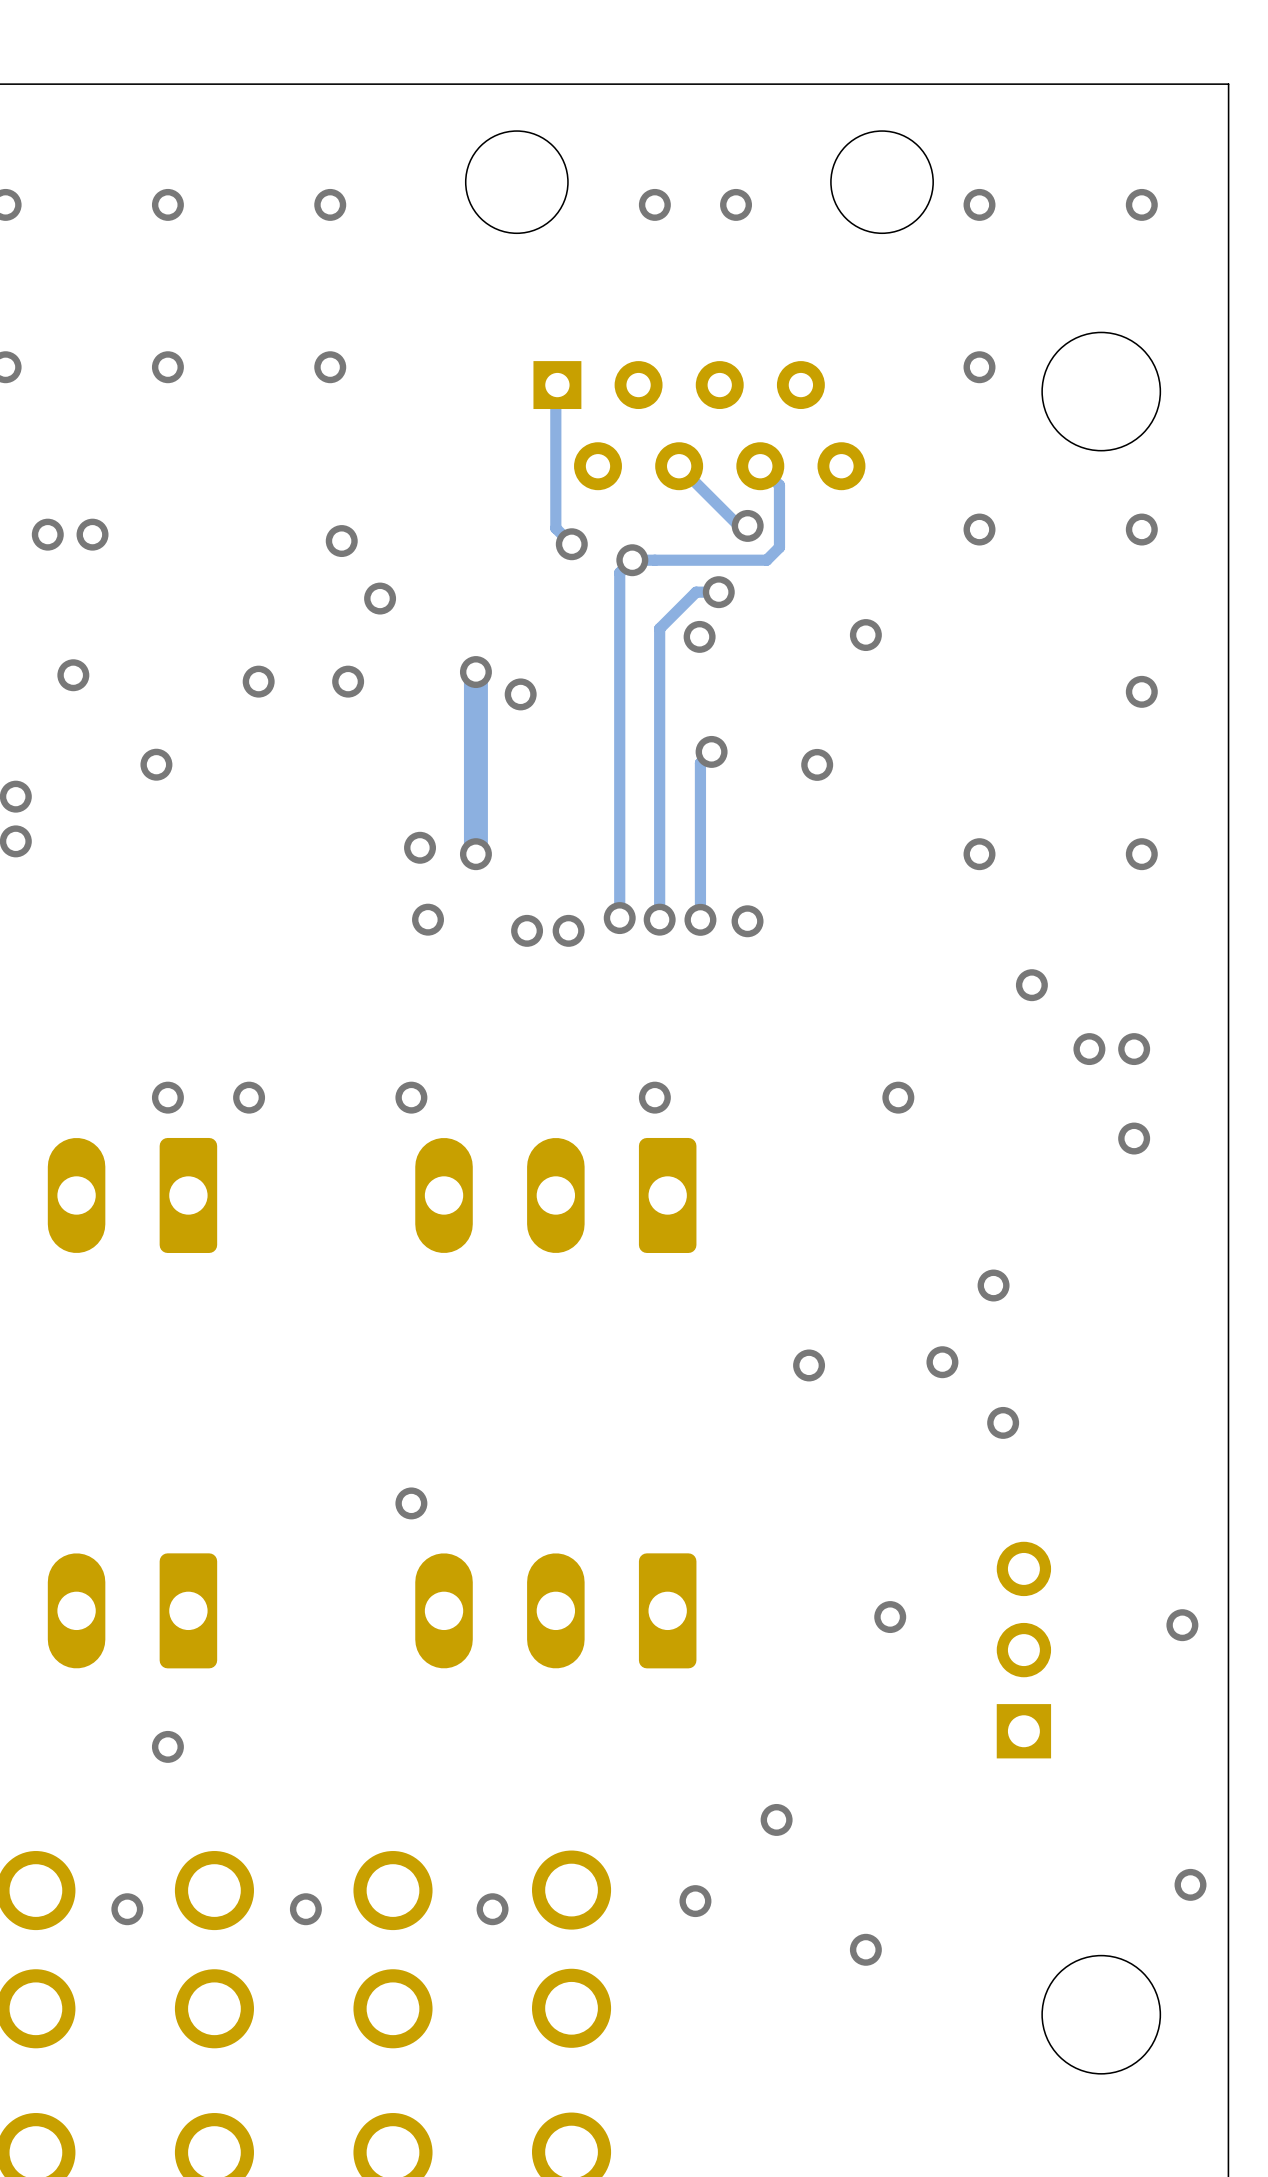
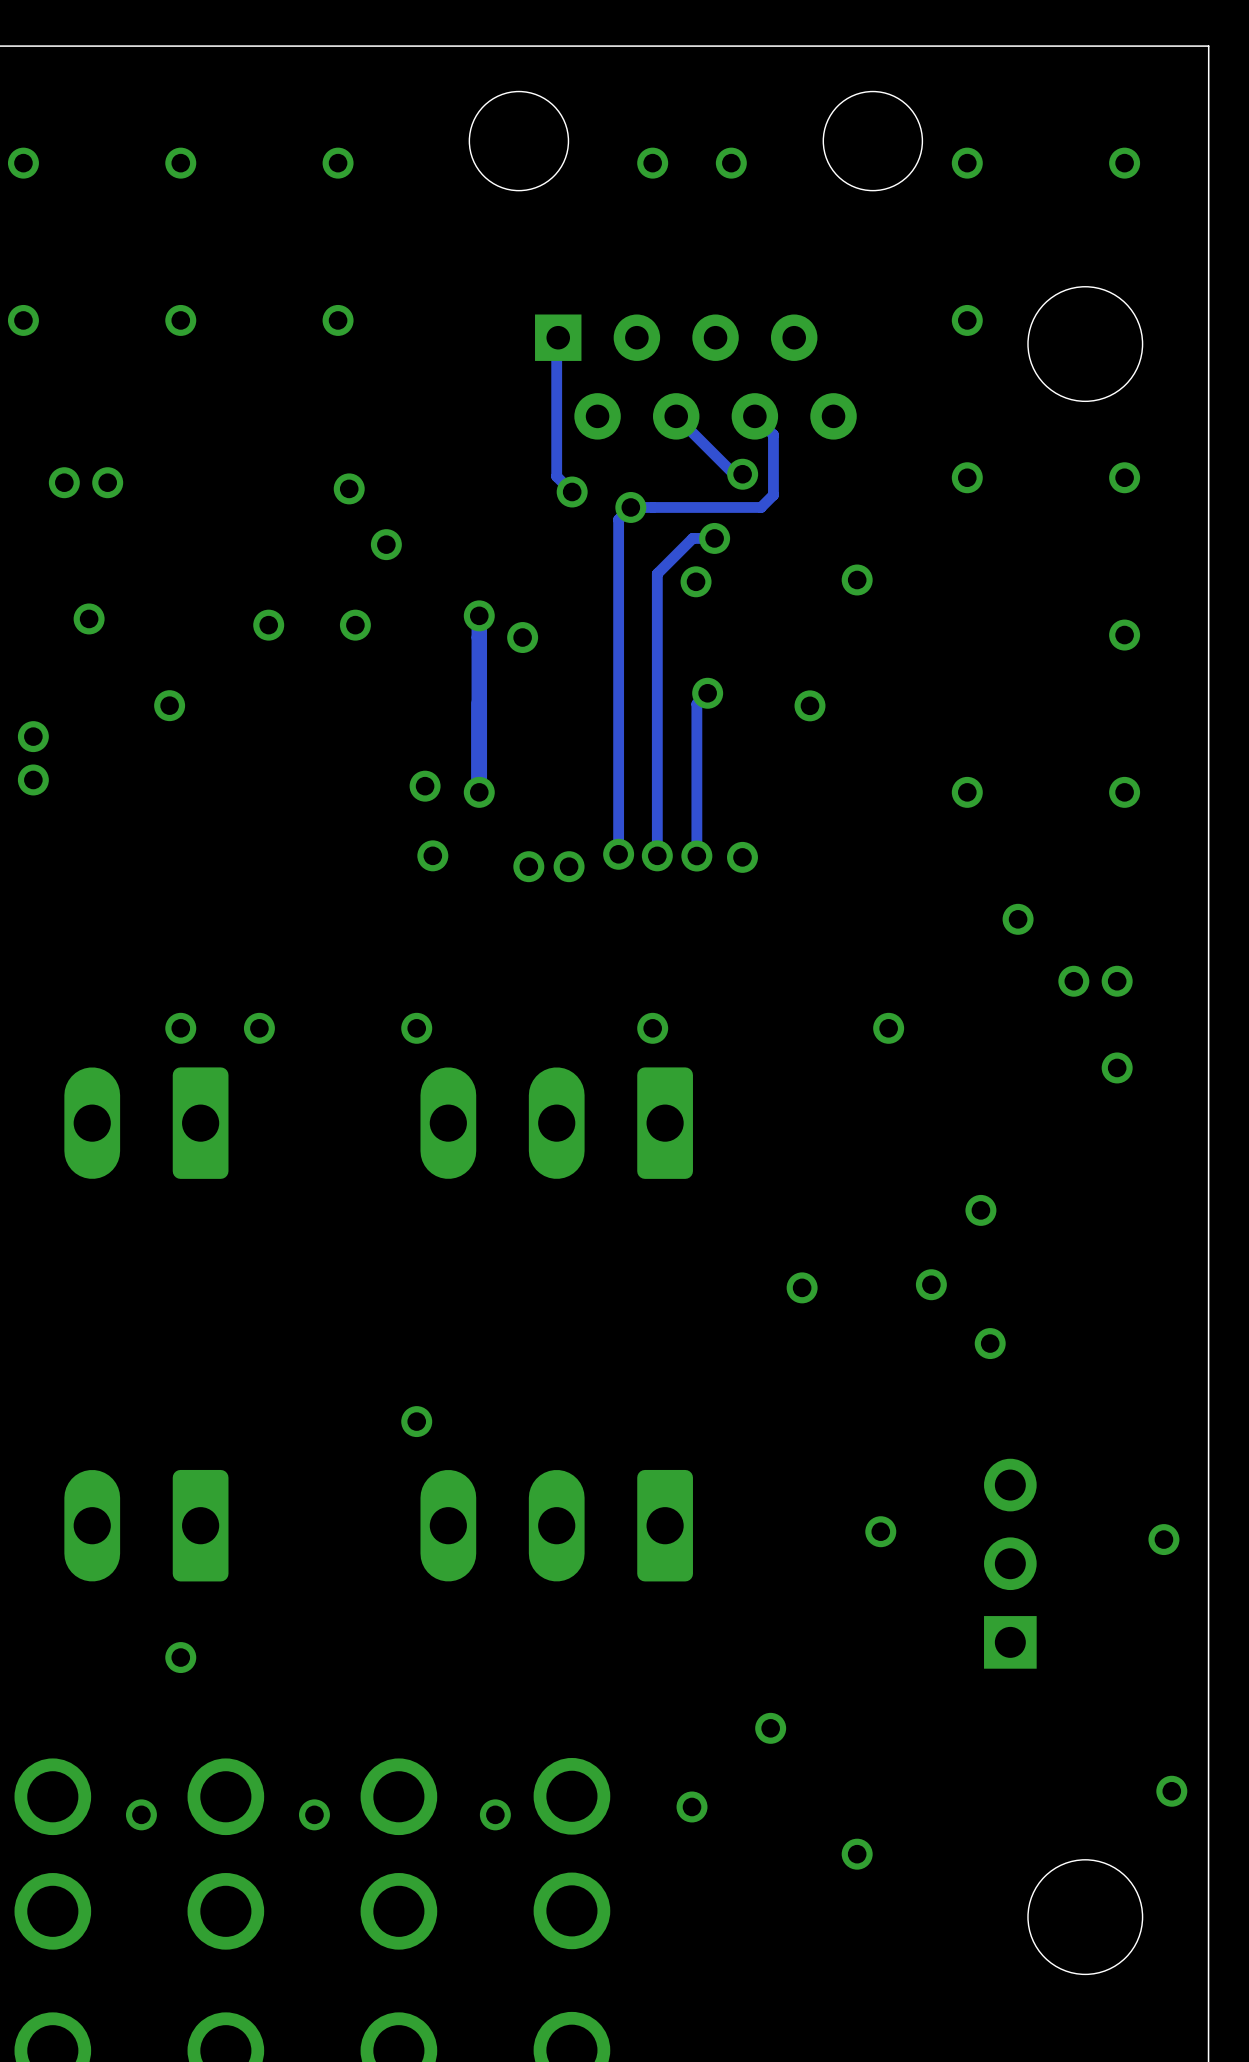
track width: thick (475, 672) (475, 854) -> thin (479, 615) (479, 792)

